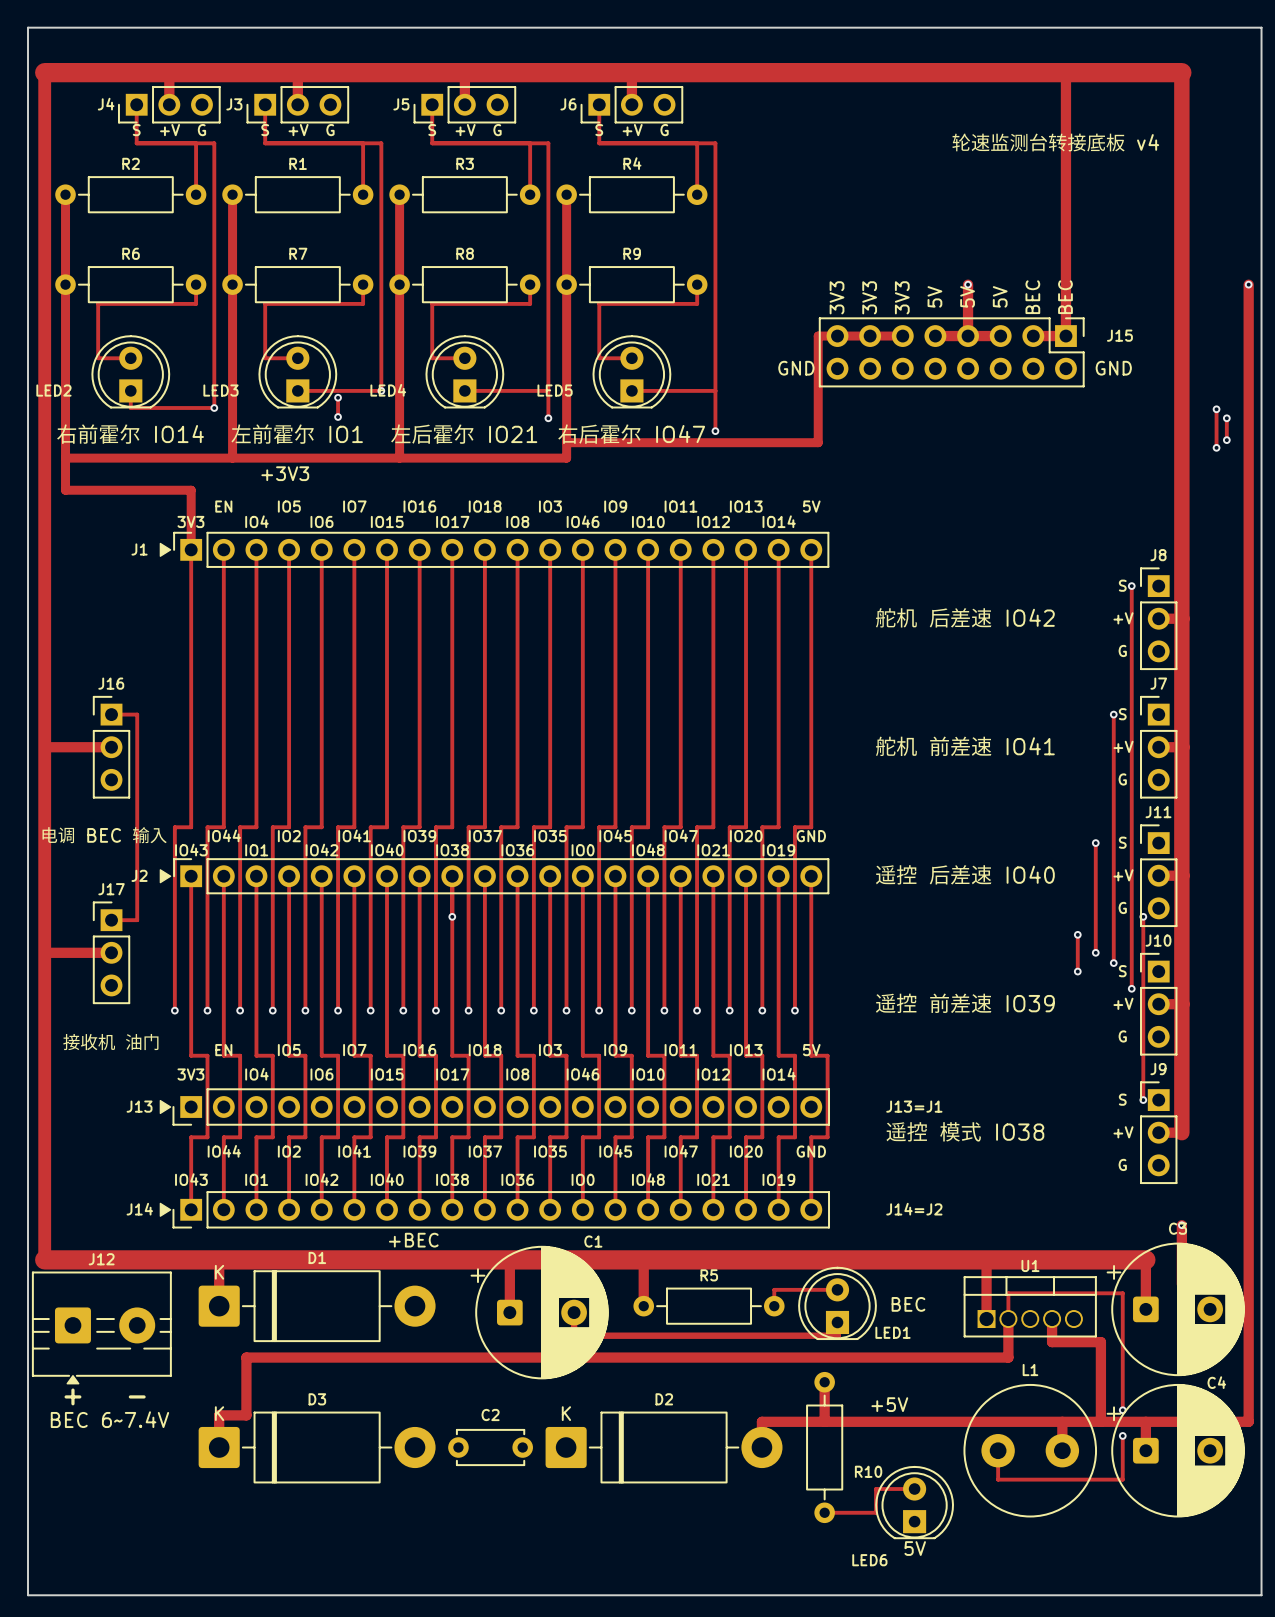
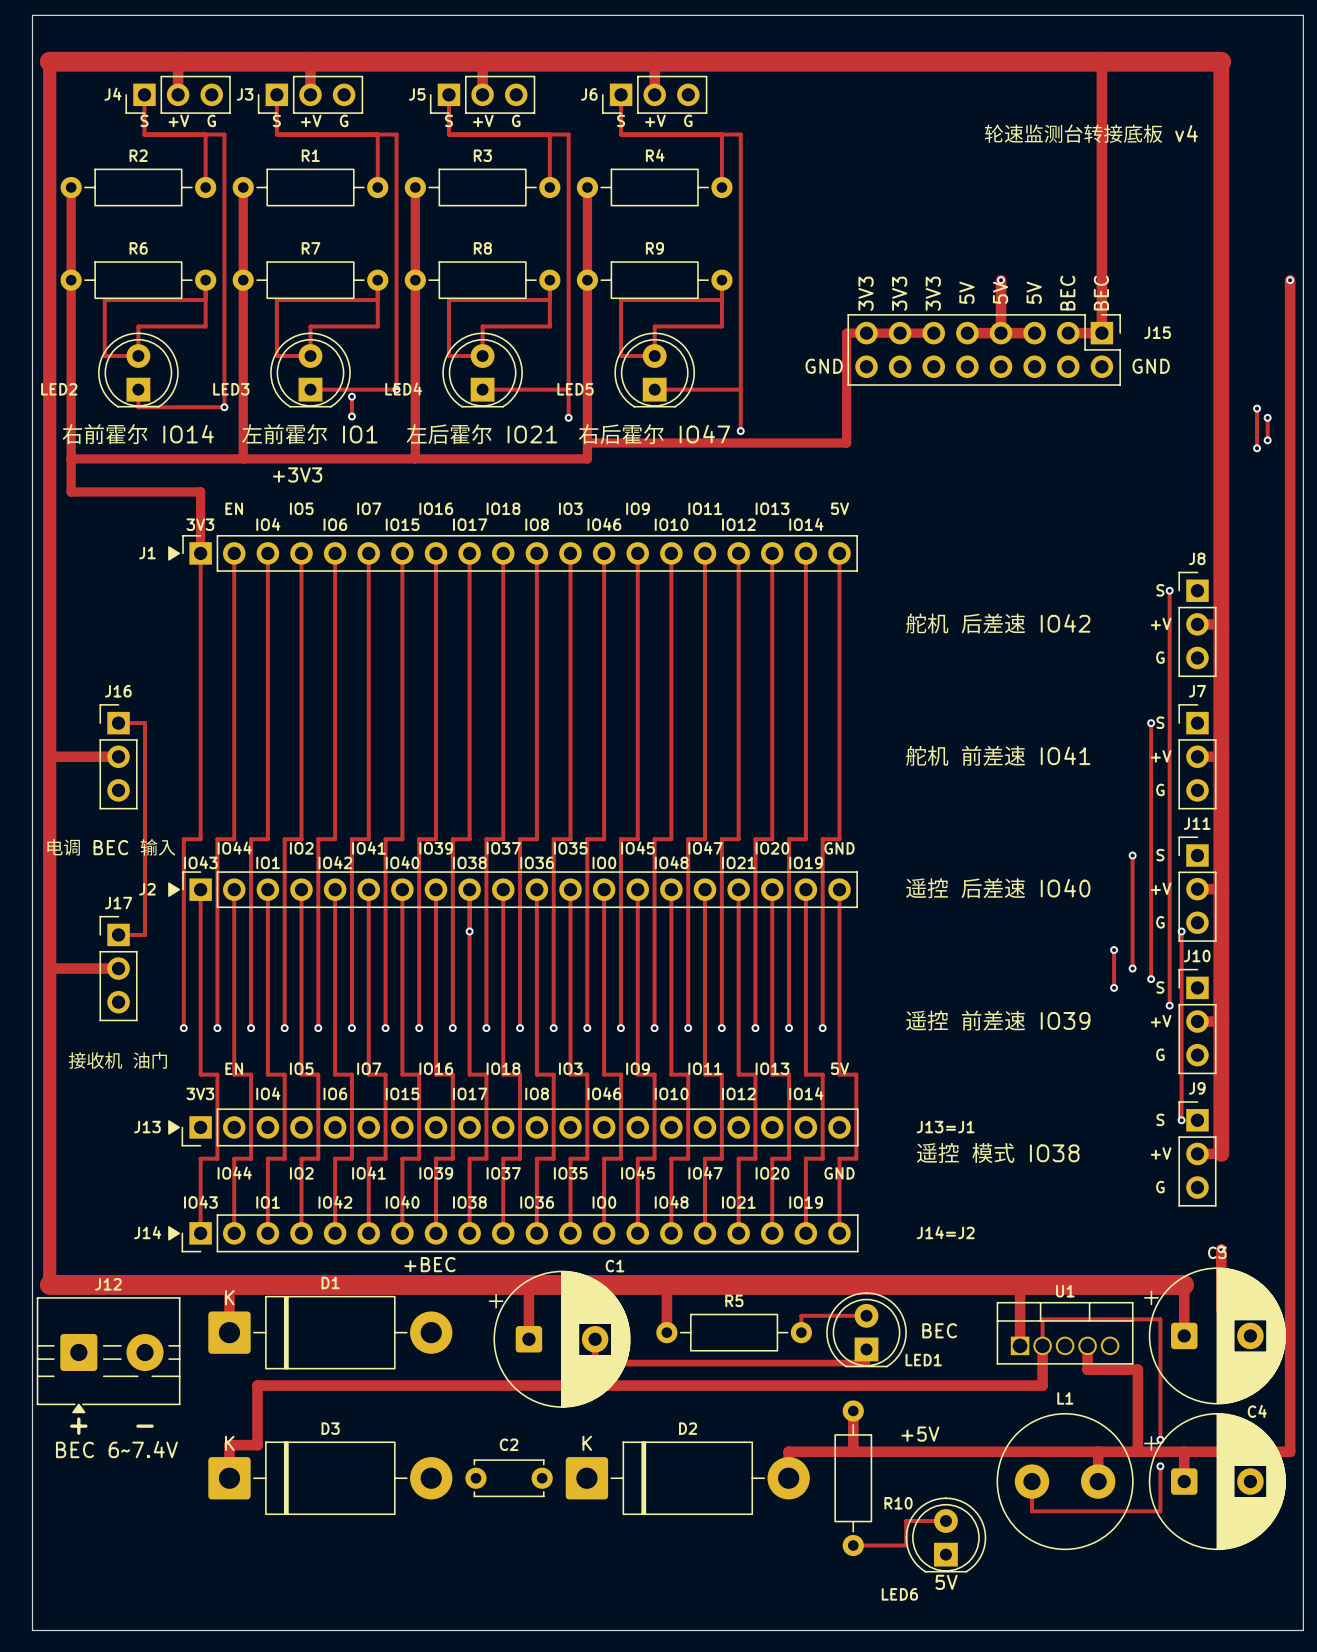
track: none -> (205, 300) (205, 326) (138, 326) (138, 356)
track: none -> (377, 300) (377, 326) (310, 326) (310, 356)
track: none -> (549, 300) (549, 326) (482, 326) (482, 356)
track: none -> (721, 300) (721, 326) (654, 326) (654, 356)

